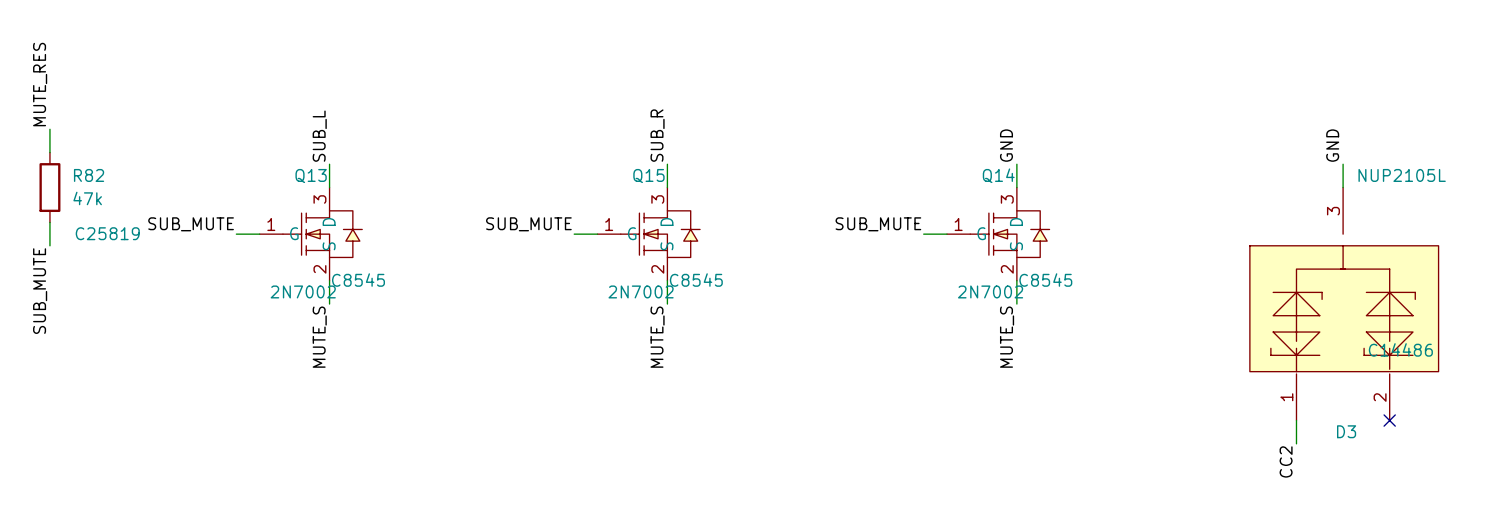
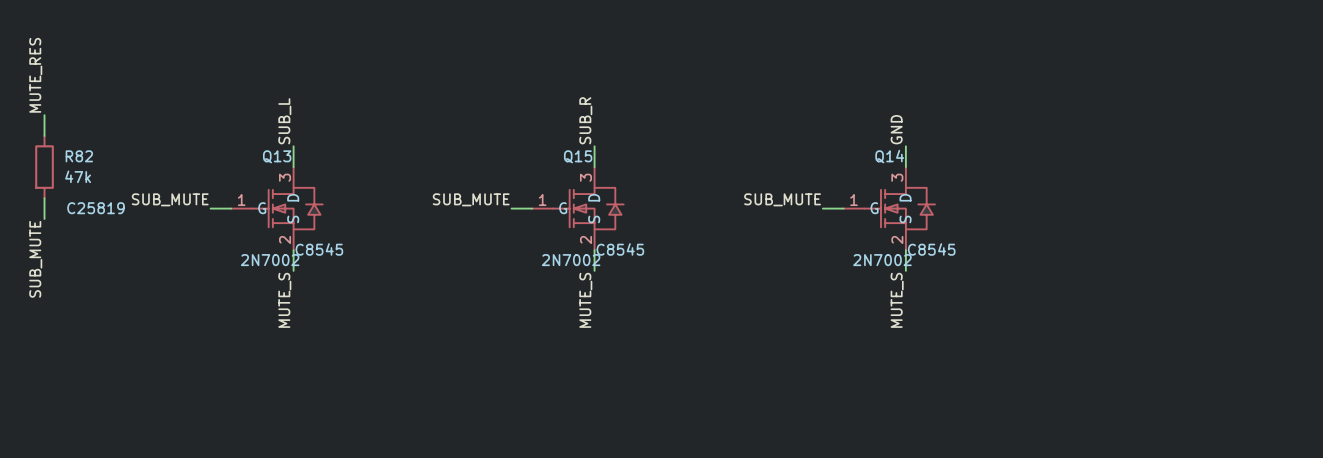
label: GND (1332, 145) -> none
wire: (1343, 164) (1343, 187) -> none
D3: NUP2105L (1344, 304) -> none
wire: (1296, 420) (1296, 443) -> none
no-connect mark: (1389, 420) -> none
label: CC2 (1286, 461) -> none

